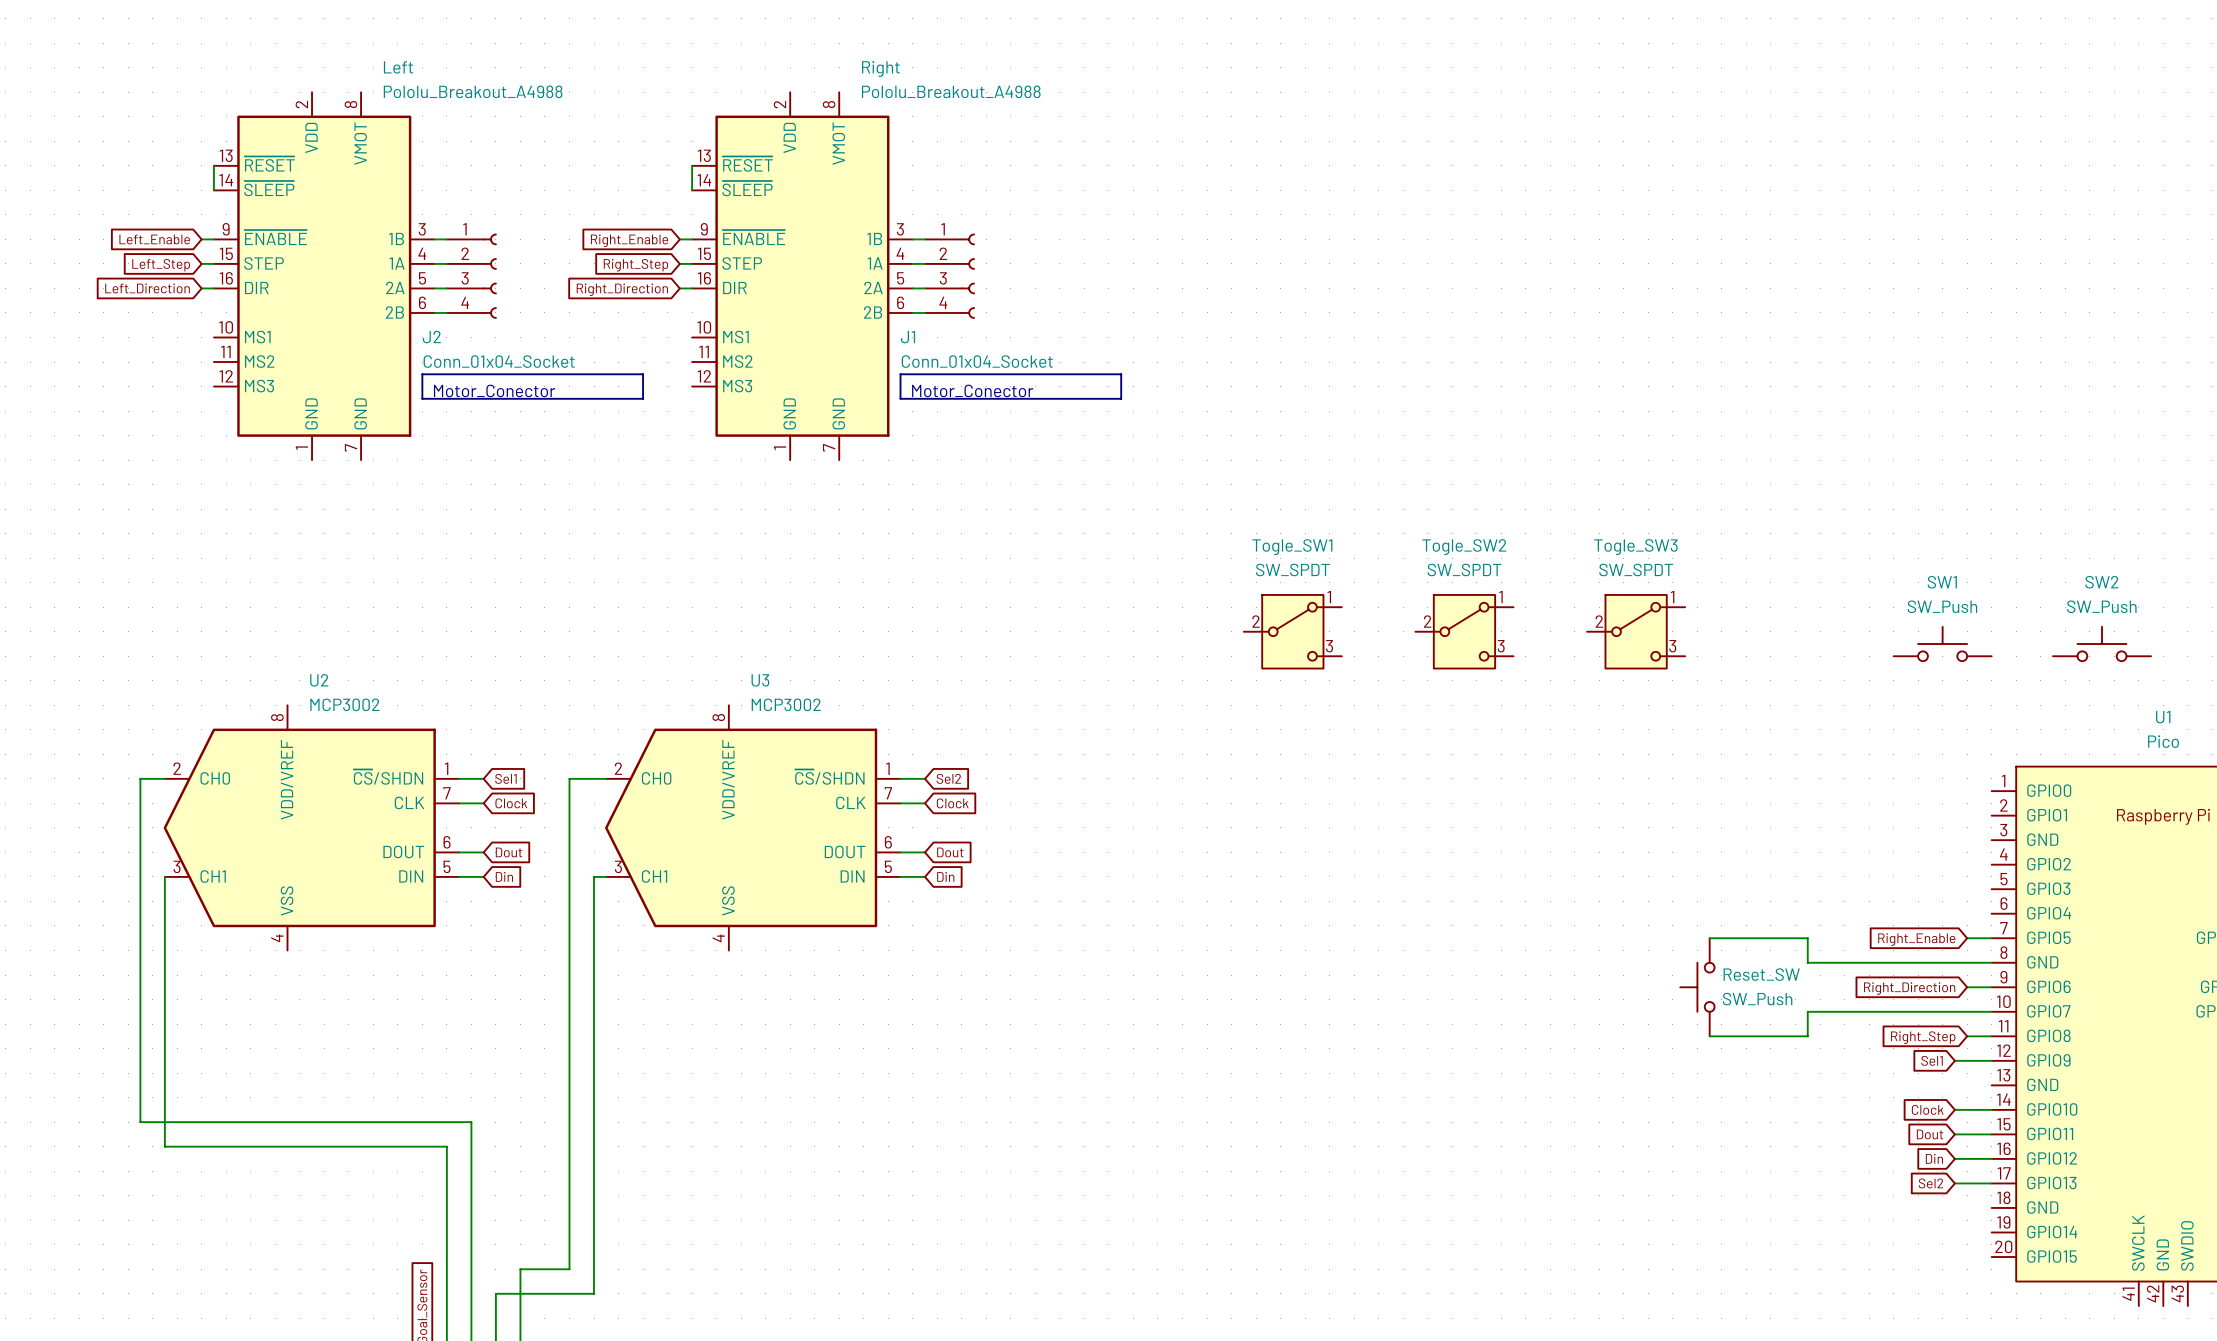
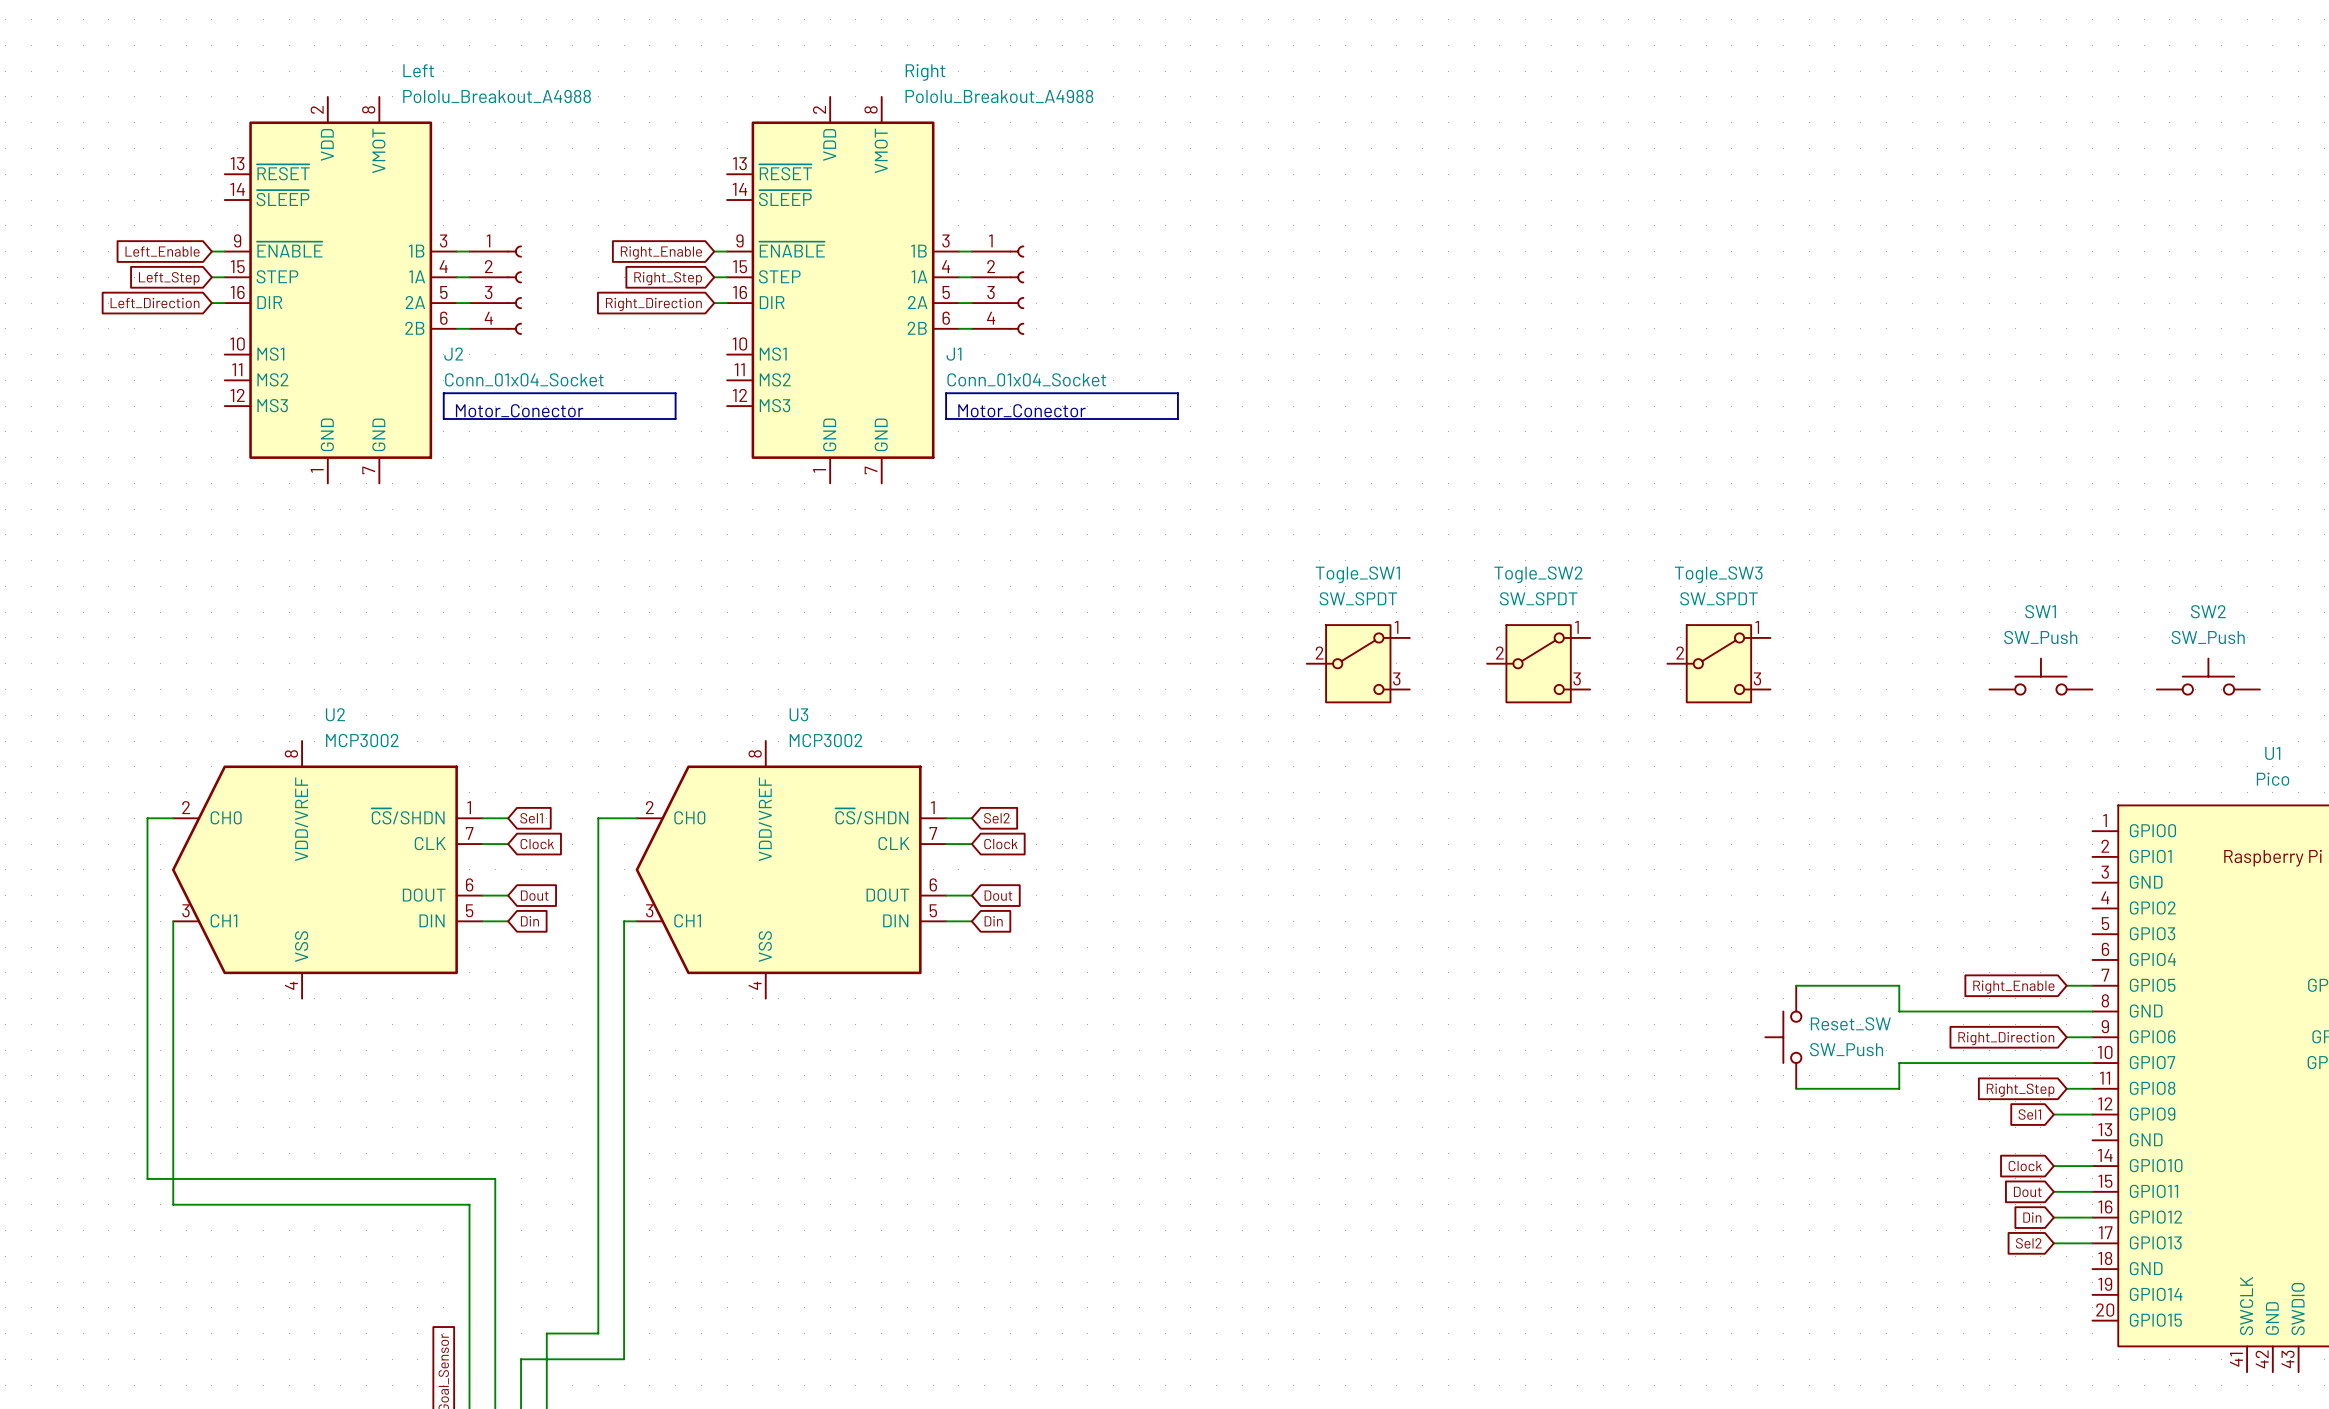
wire: (213, 165) (213, 190) -> none
wire: (692, 165) (692, 190) -> none

